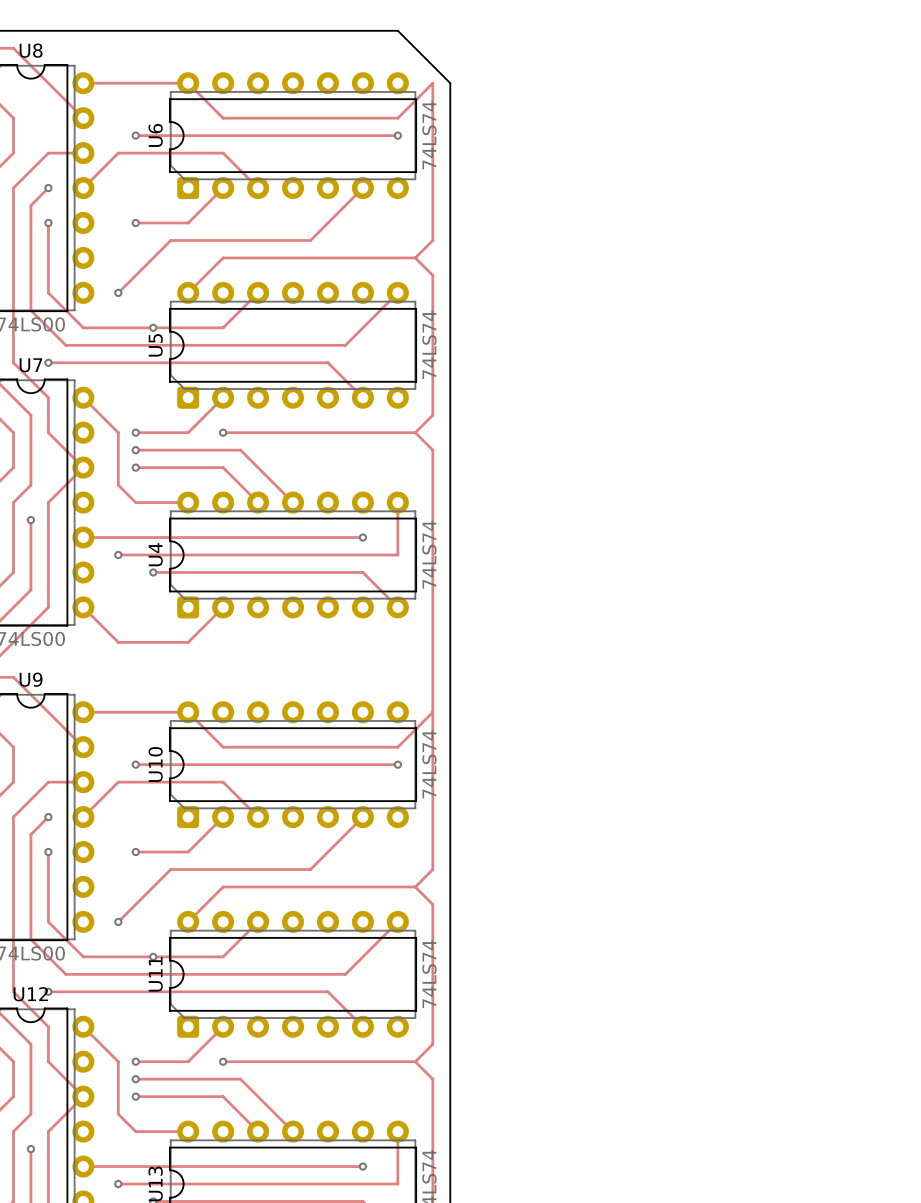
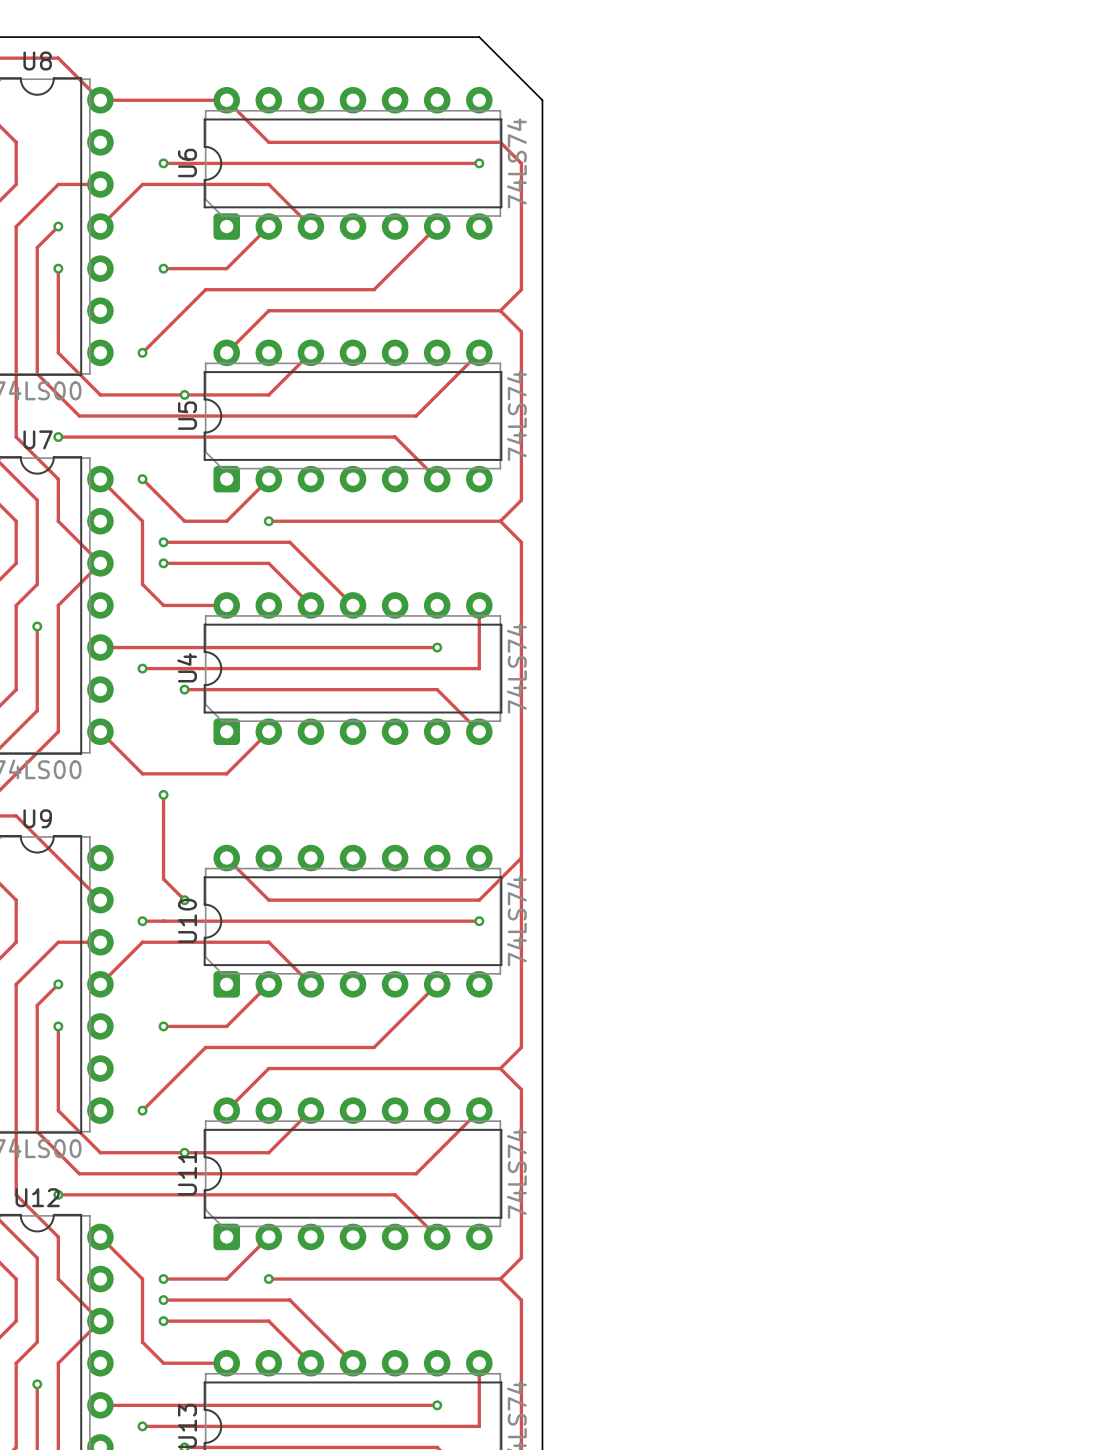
track: (13, 48) (83, 118) -> (16, 58) (58, 58) (100, 100)
track: (397, 118) (432, 83) (432, 135) -> (479, 142) (500, 142) (521, 163)
track: (135, 432) (153, 432) -> (142, 479) (184, 521)
via position: (135, 432) -> (142, 479)
track: none -> (163, 794) (163, 879) (184, 900)
via: none -> (163, 794)
track: (83, 712) (188, 712) -> none
via: none -> (184, 900)
track: none -> (142, 921) (163, 921)
via: none -> (142, 921)
via: (135, 764) -> none

